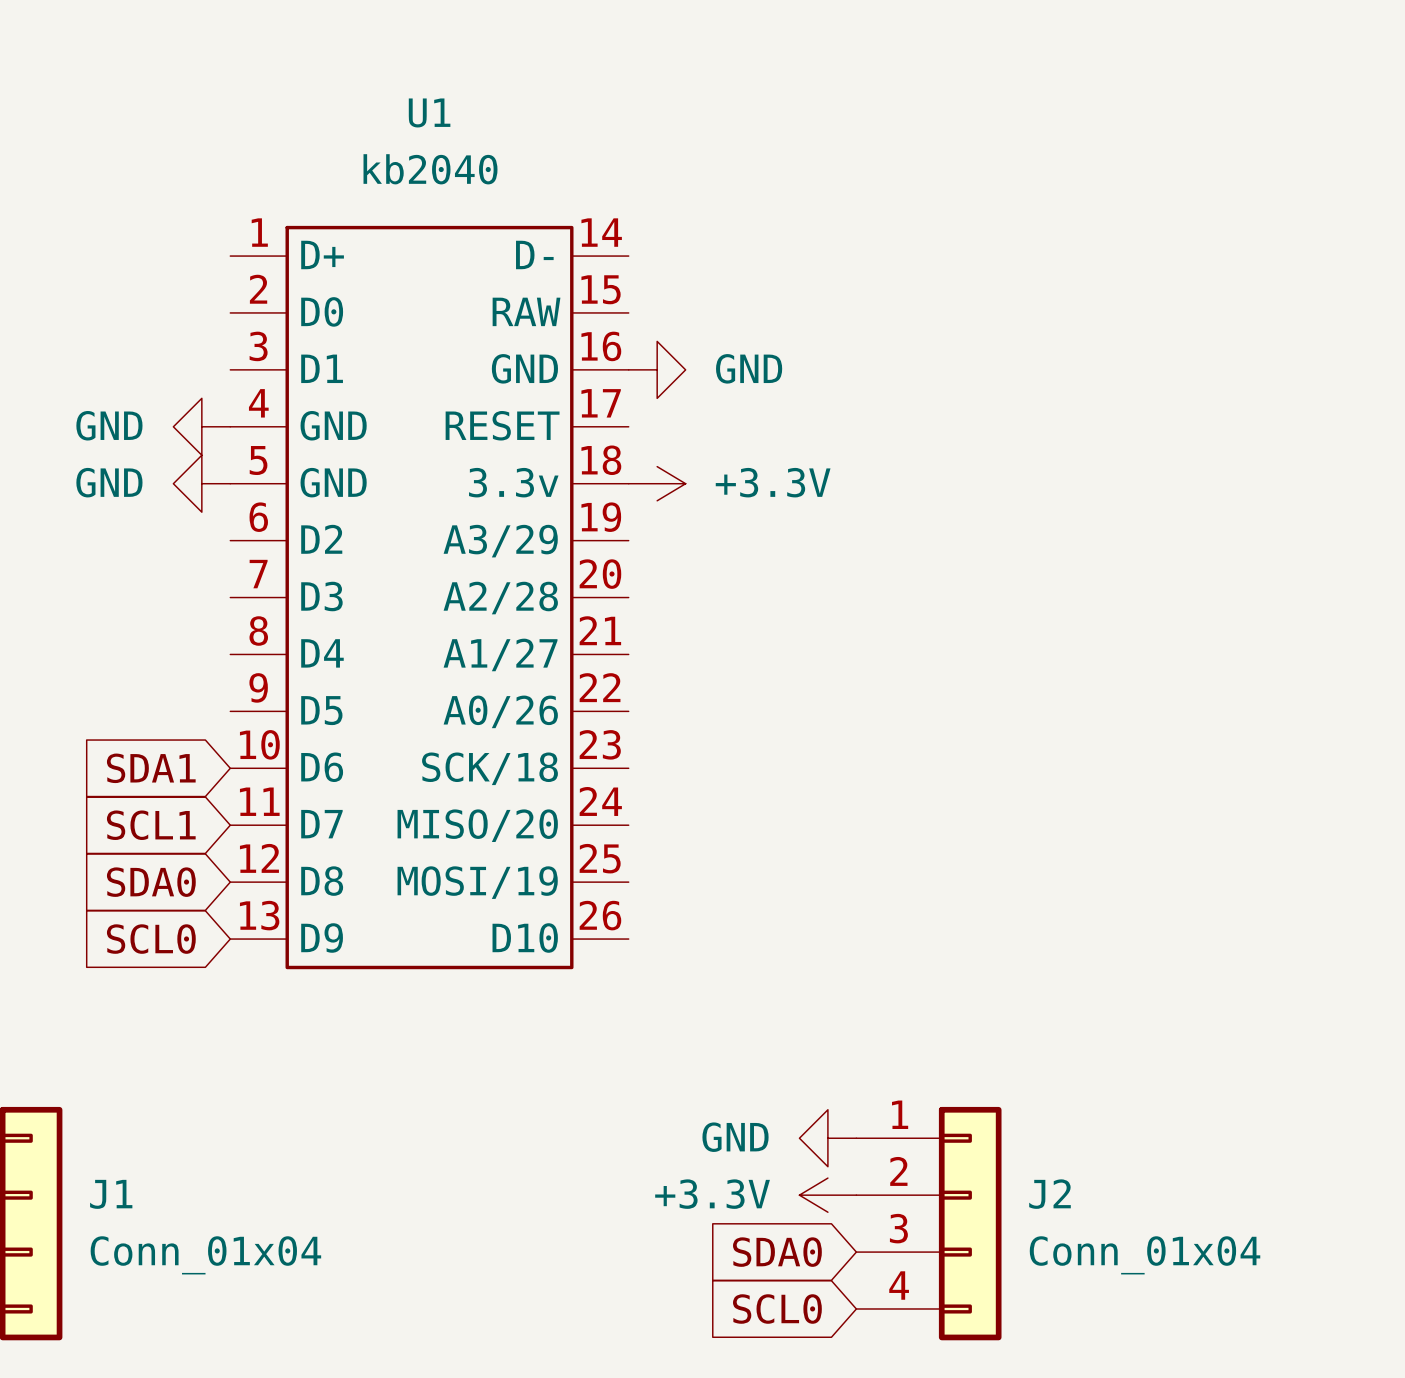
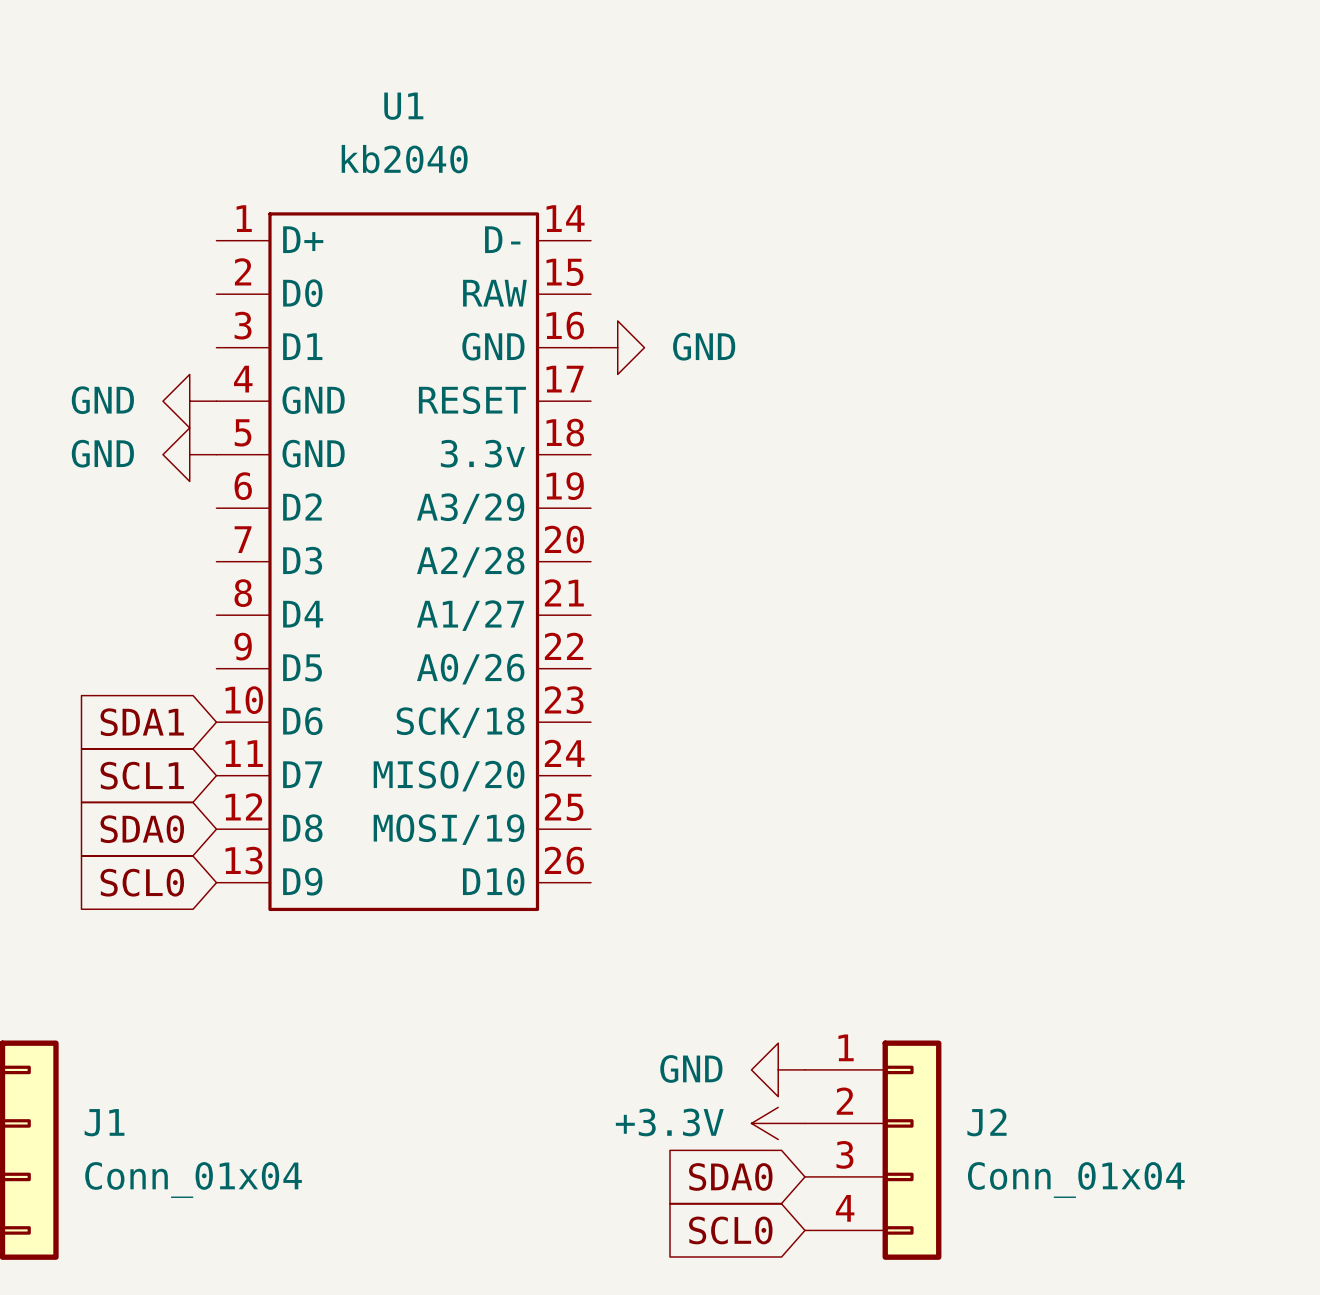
power symbol: +3.3V (657, 483) -> none

